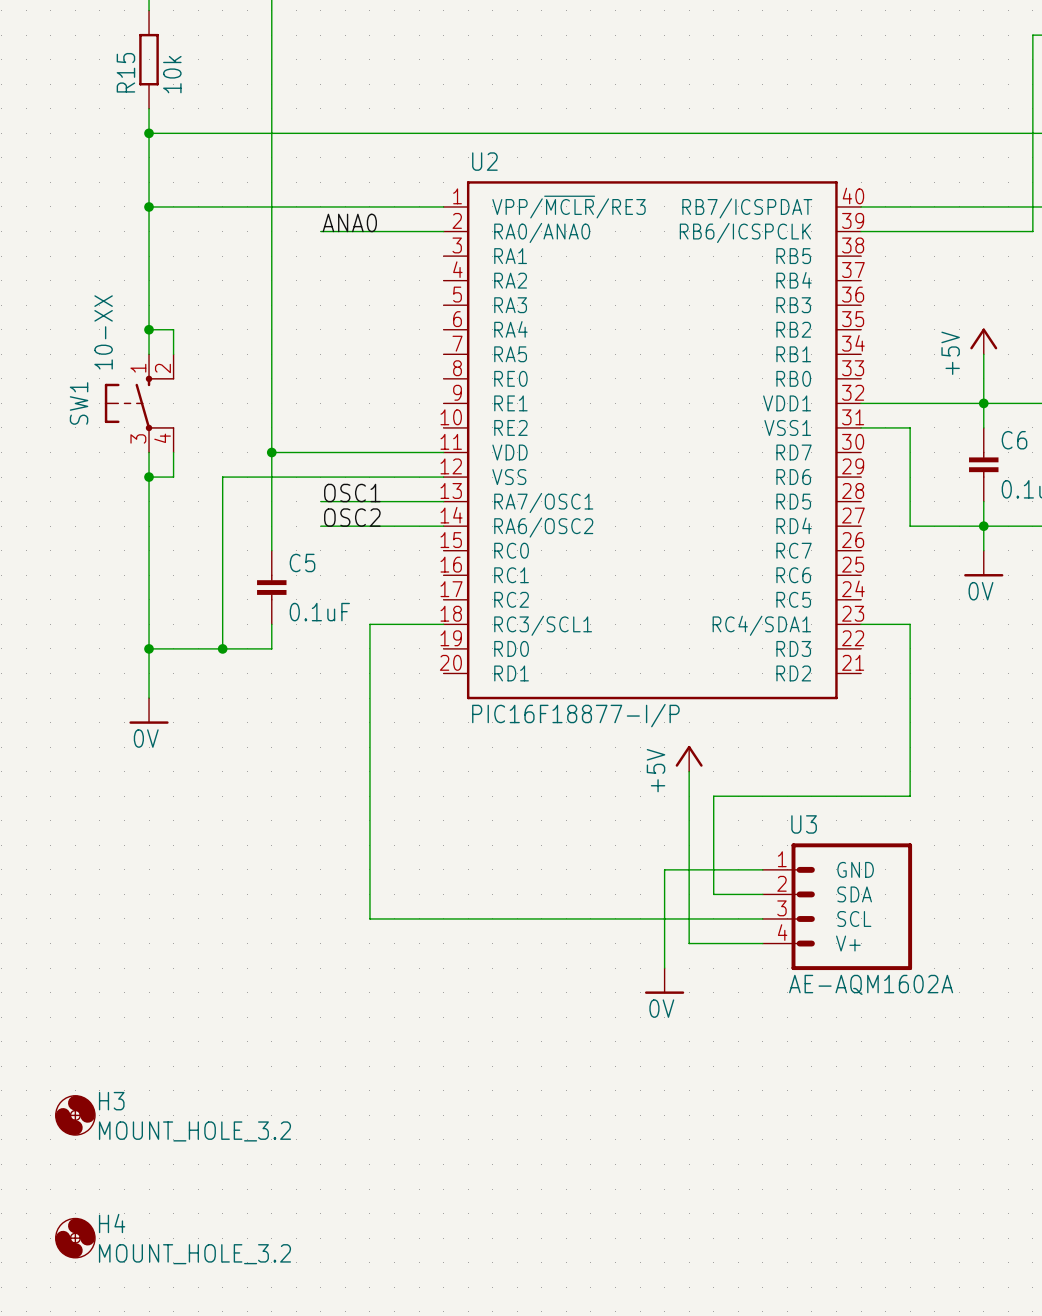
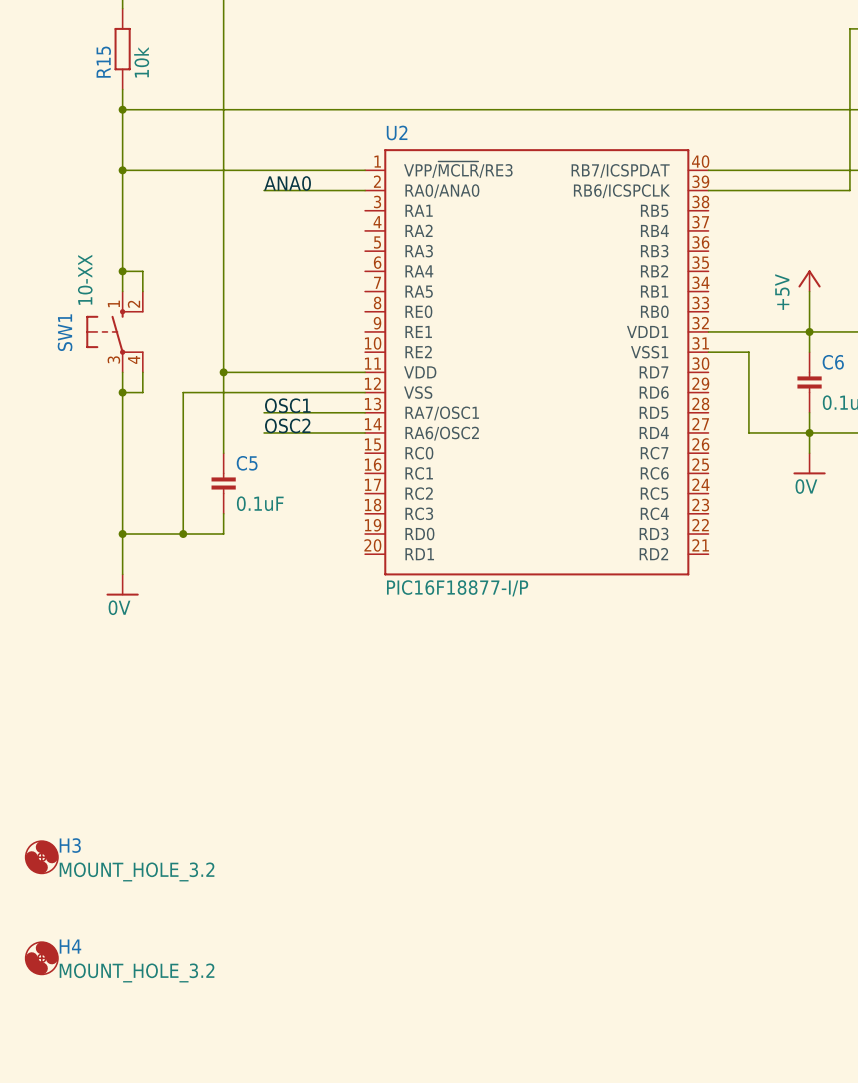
wire: (443, 624) (369, 624) (369, 918) (762, 918) -> none
wire: (861, 624) (910, 624) (910, 796) (713, 796) (713, 894) (762, 894) -> none
U2 pin name: RC3/SCL1 (543, 625) -> RC3 (419, 513)
U2 pin name: RC4/SDA1 (761, 625) -> RC4 (654, 513)
power symbol: +5V (689, 758) -> none
wire: (689, 771) (689, 943) (762, 943) -> none
wire: (762, 869) (664, 869) (664, 968) -> none
U3: AE-AQM1602A (837, 906) -> none
power symbol: 0V (664, 980) -> none
H3 position: (75, 1115) -> (41, 857)
H4 position: (75, 1238) -> (41, 958)

